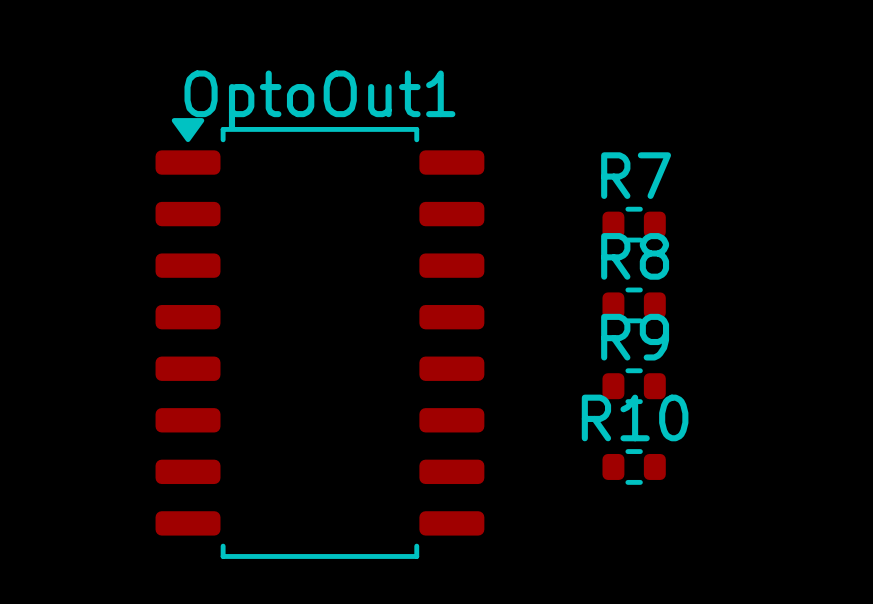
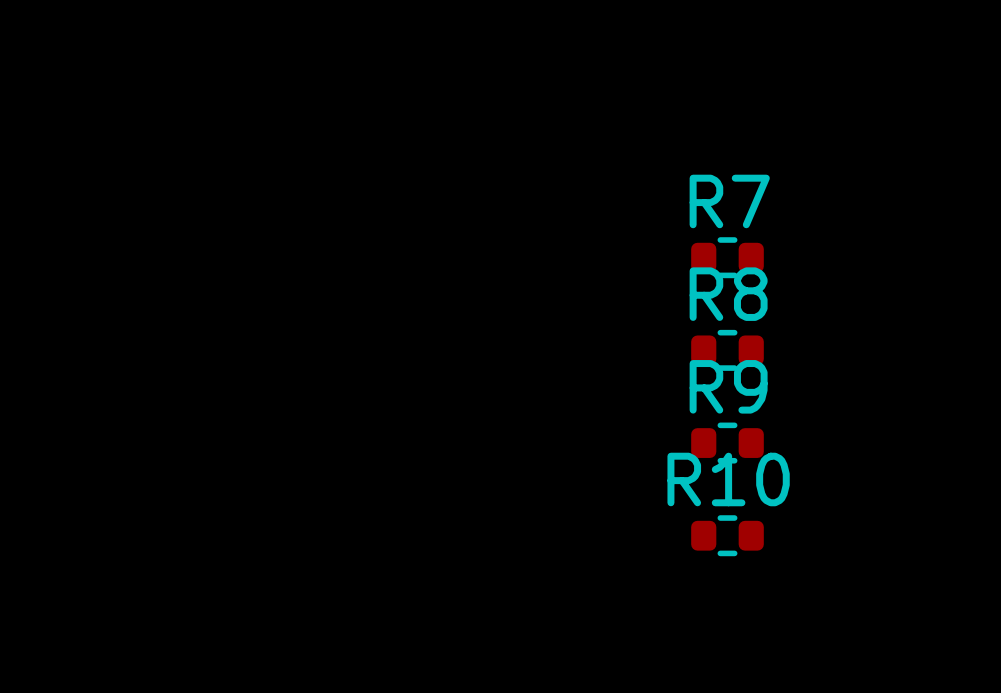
OptoOut1: (319, 338) -> none

